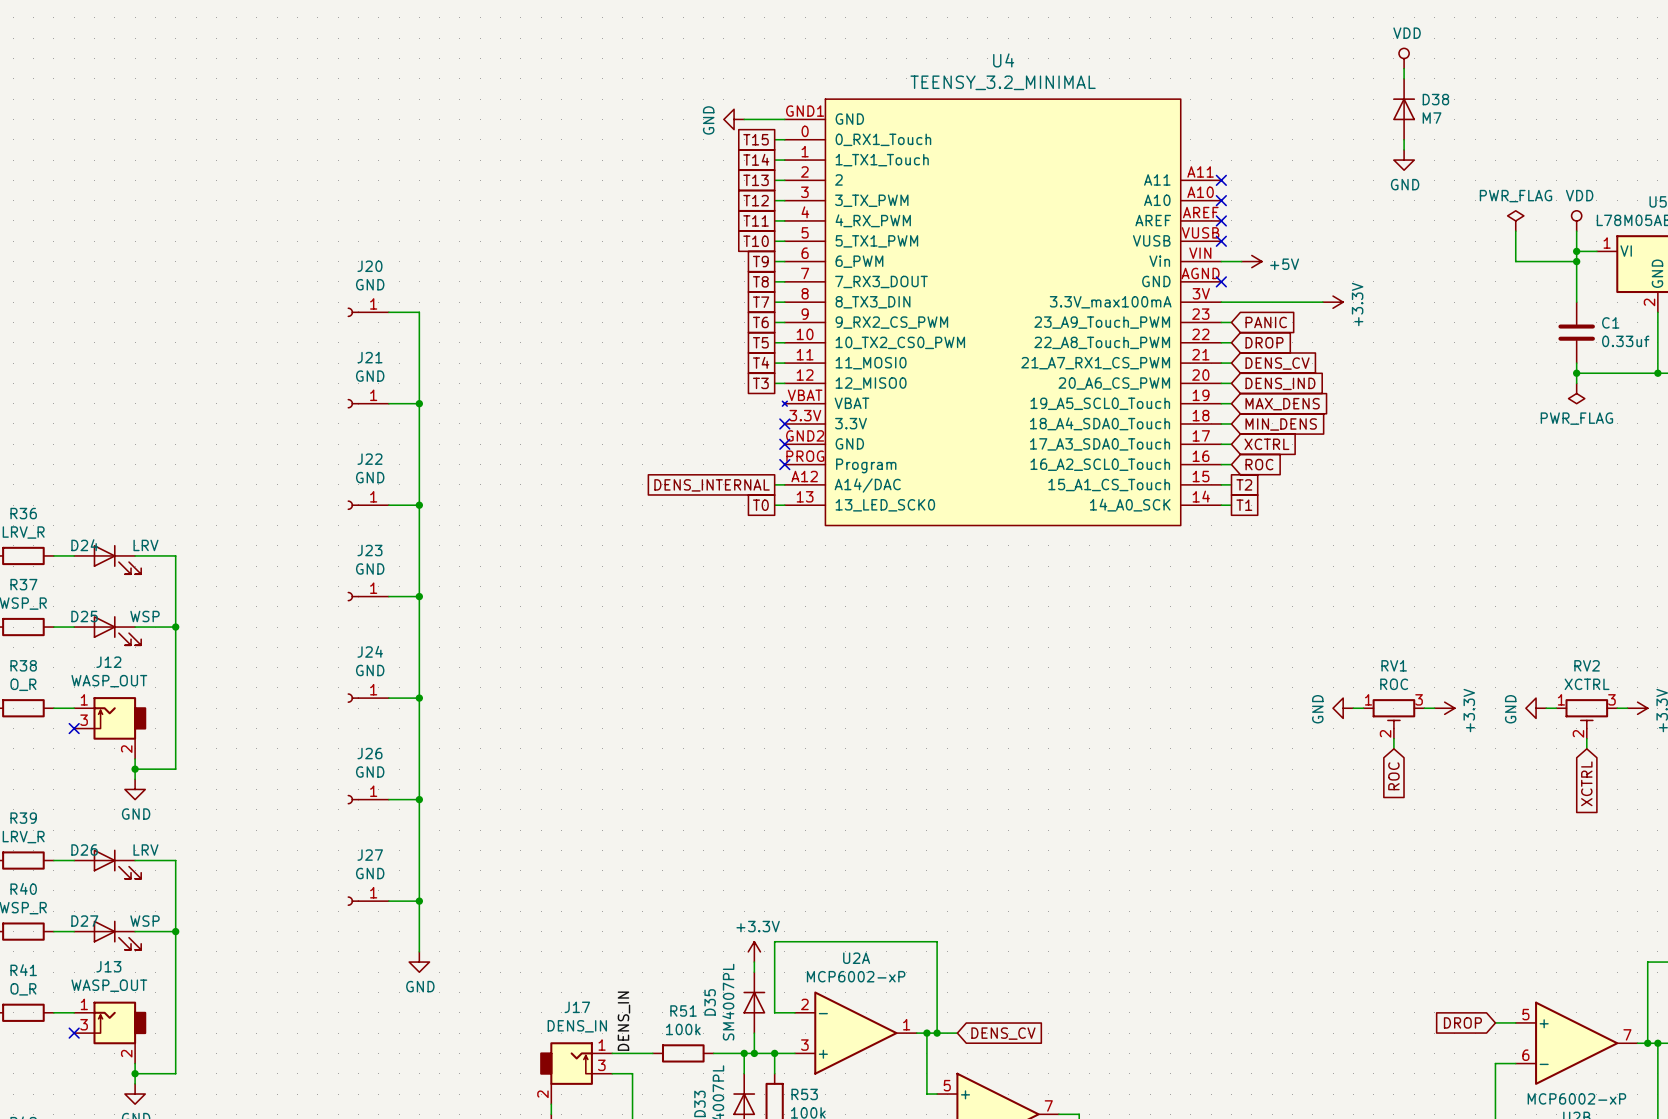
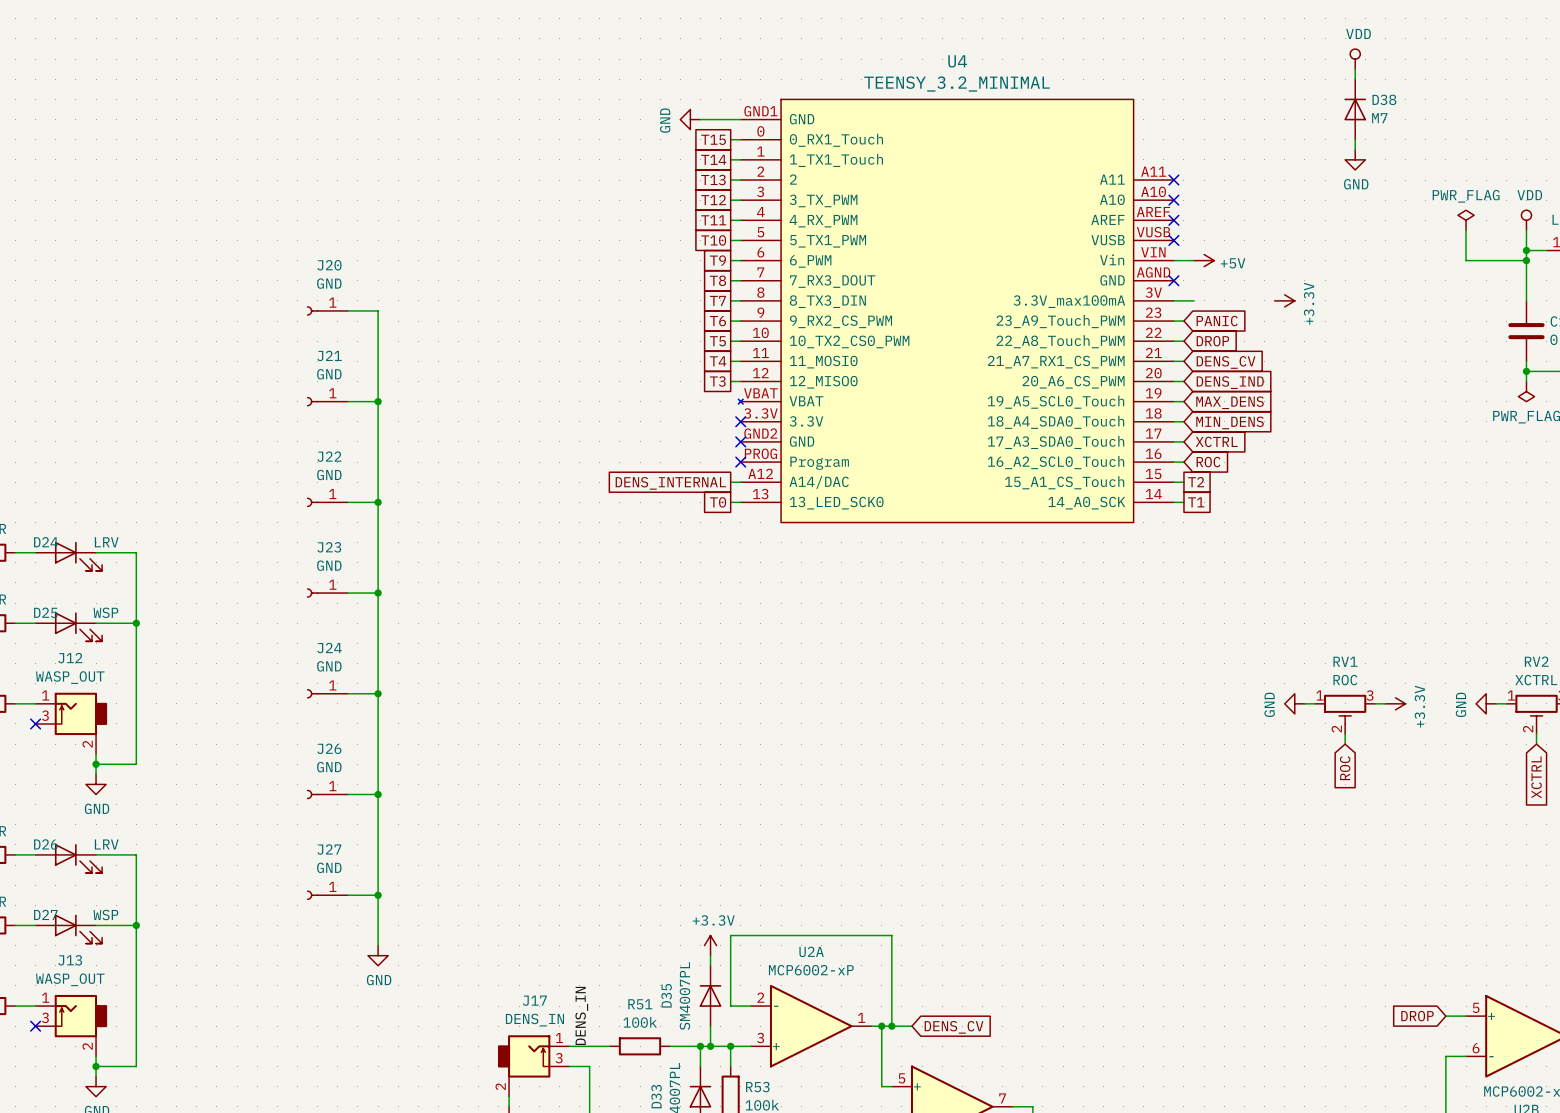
wire: (1241, 302) (1322, 302) -> none

